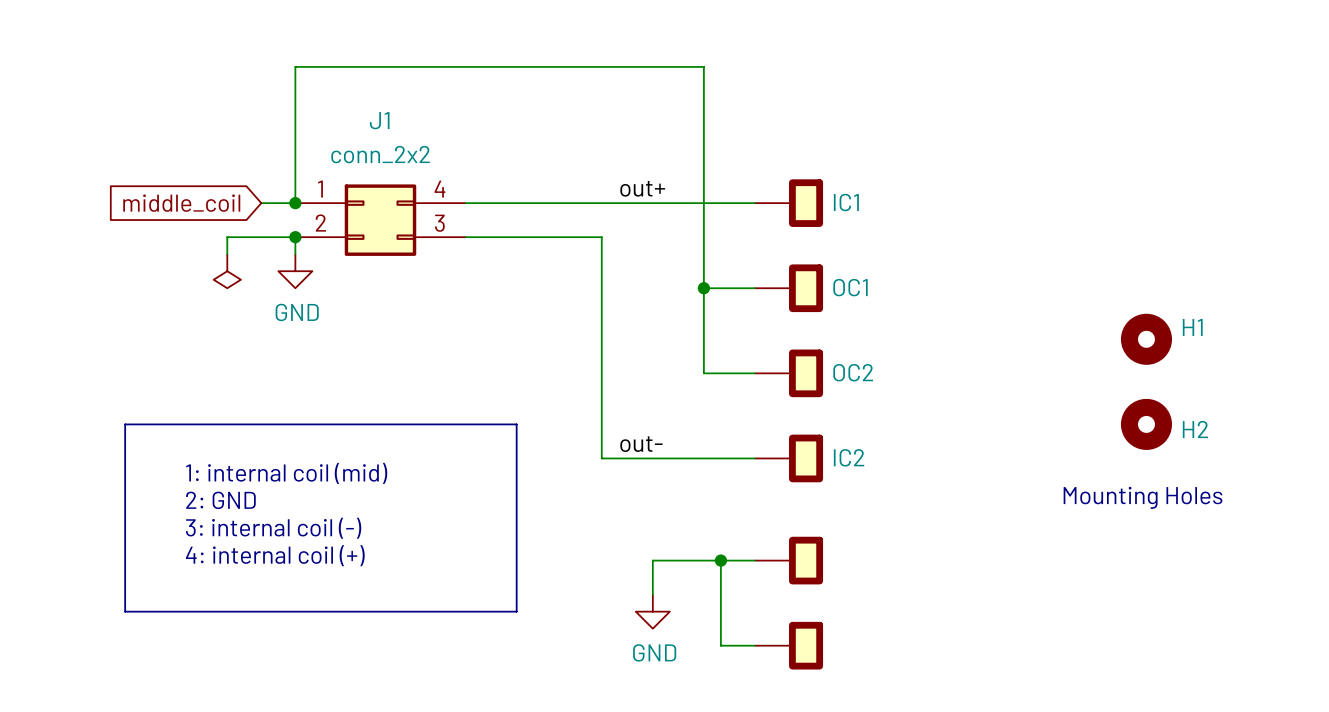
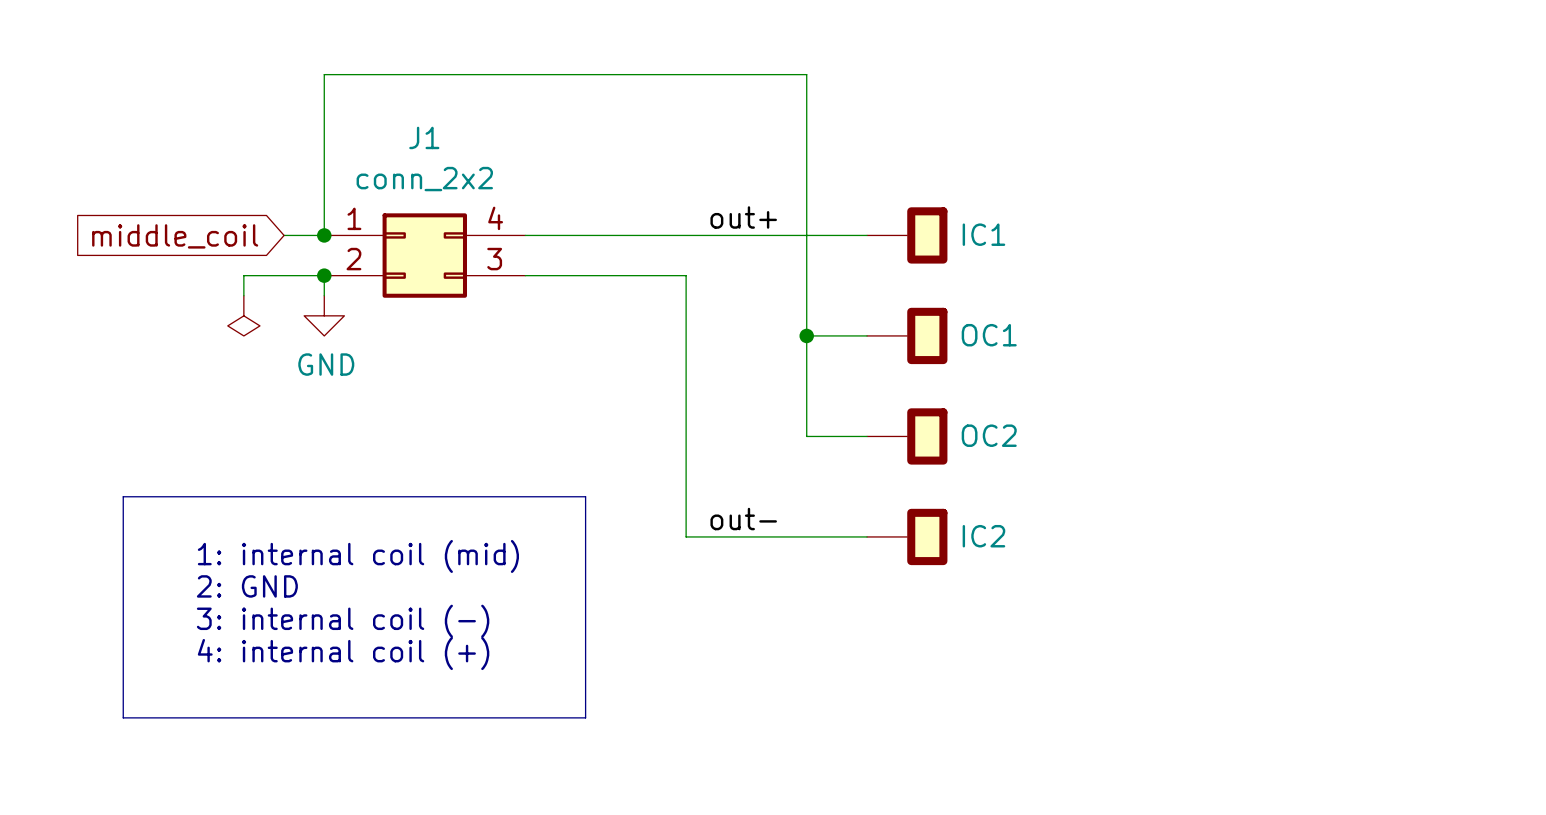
H1: (1146, 339) -> none
H2: (1146, 424) -> none
text: Mounting Holes (1143, 497) -> none
wire: (720, 560) (720, 645) (754, 645) -> none
junction: (720, 560) -> none
wire: (754, 560) (652, 560) (652, 594) -> none
part: (789, 560) -> none
power symbol: GND (652, 611) -> none
part: (789, 645) -> none

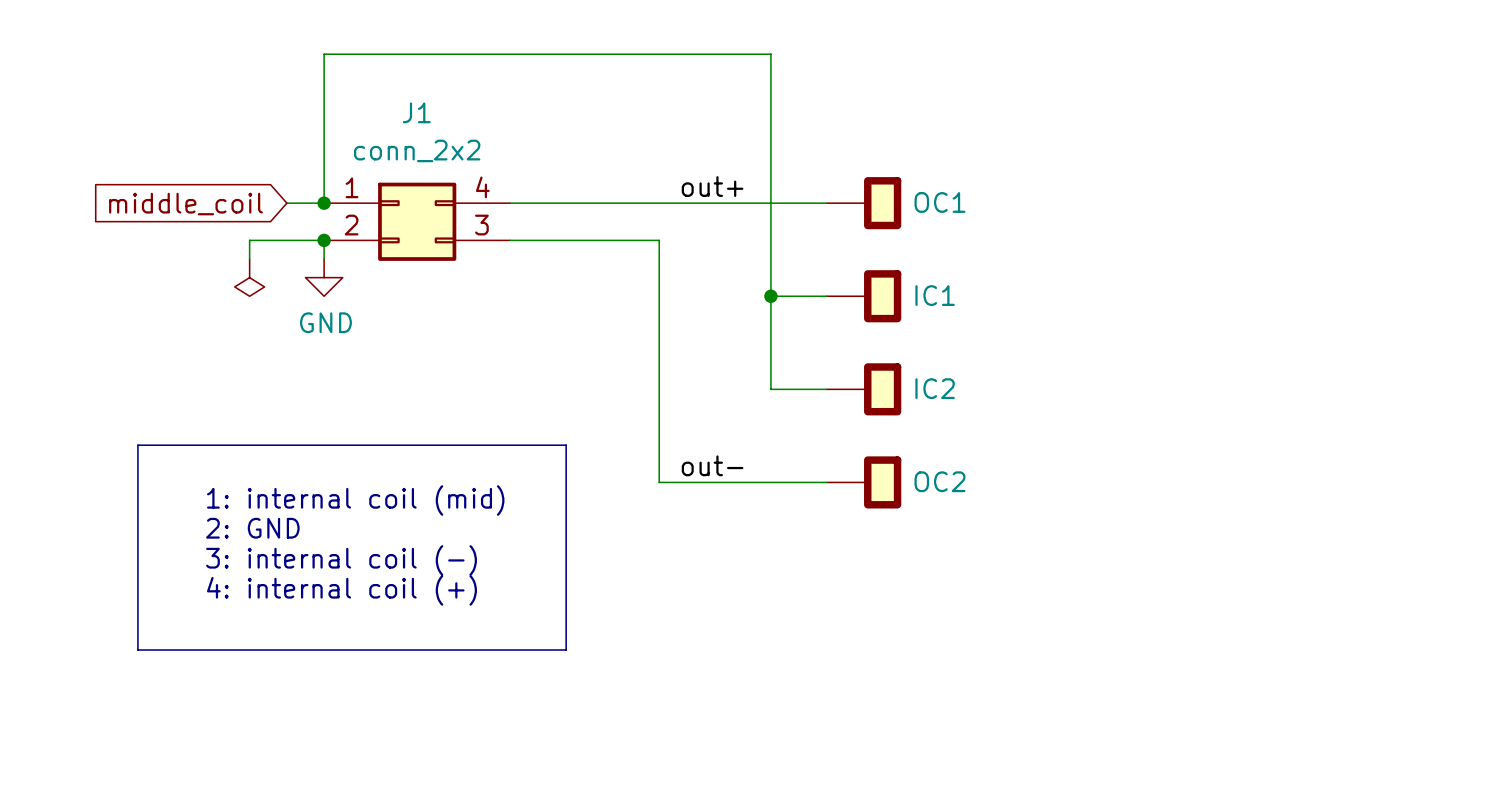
IC1 name: IC1 (983, 234) -> OC1 (939, 202)
OC1 name: OC1 (989, 335) -> IC1 (935, 295)
OC2 name: OC2 (989, 435) -> IC2 (935, 388)
IC2 name: IC2 (983, 536) -> OC2 (939, 481)

